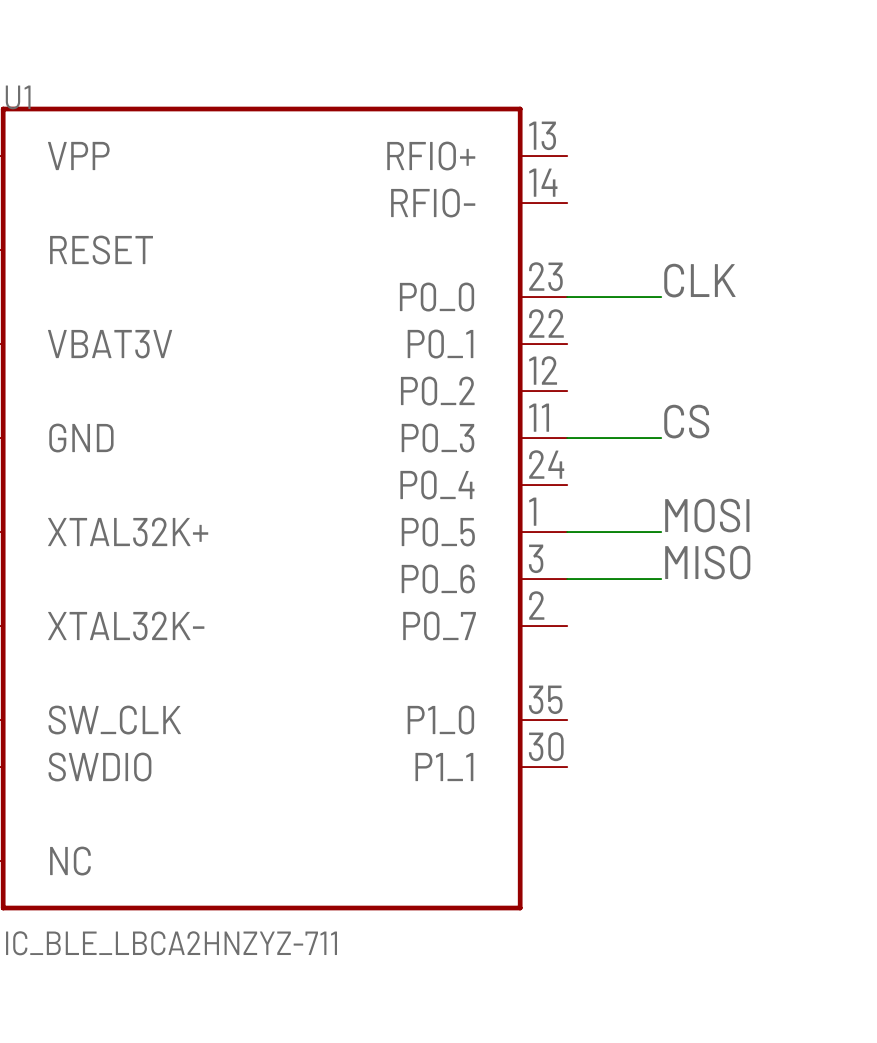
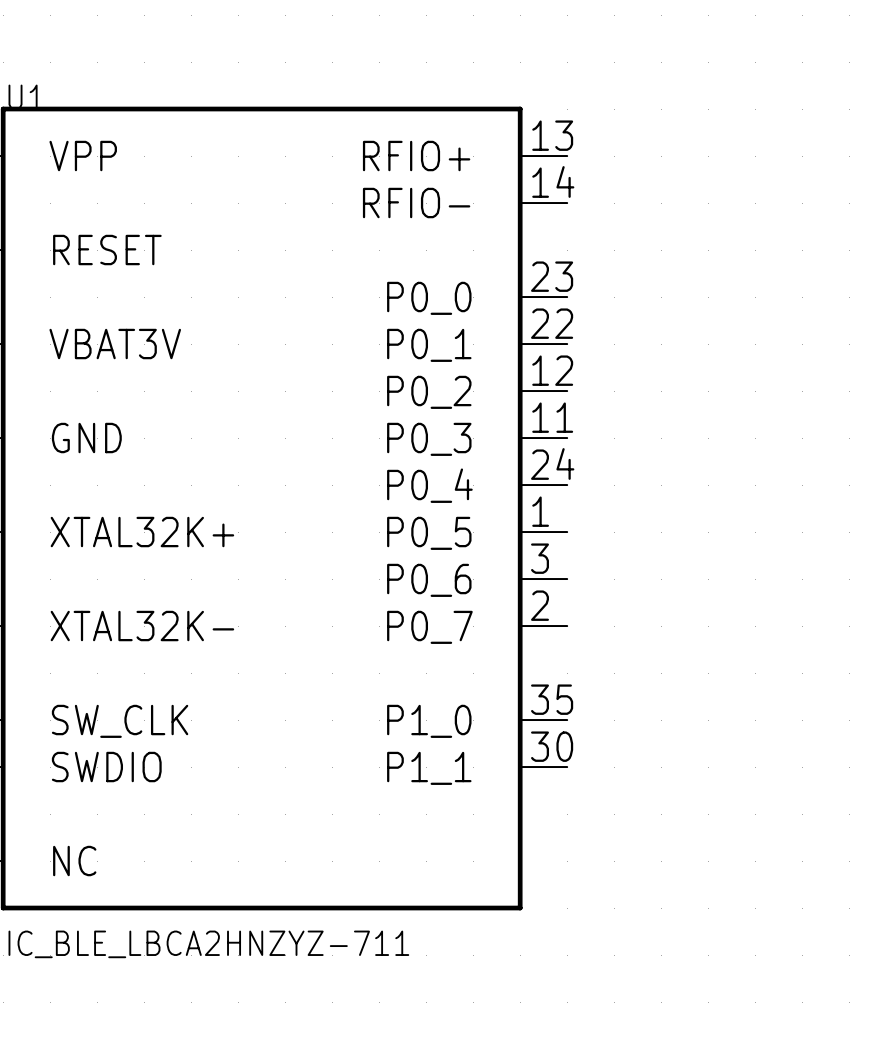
label: CLK (699, 280) -> none
wire: (567, 297) (661, 297) -> none
label: CS (686, 421) -> none
wire: (567, 438) (661, 438) -> none
label: MOSI (707, 515) -> none
wire: (567, 532) (661, 532) -> none
label: MISO (707, 562) -> none
wire: (567, 579) (661, 579) -> none

